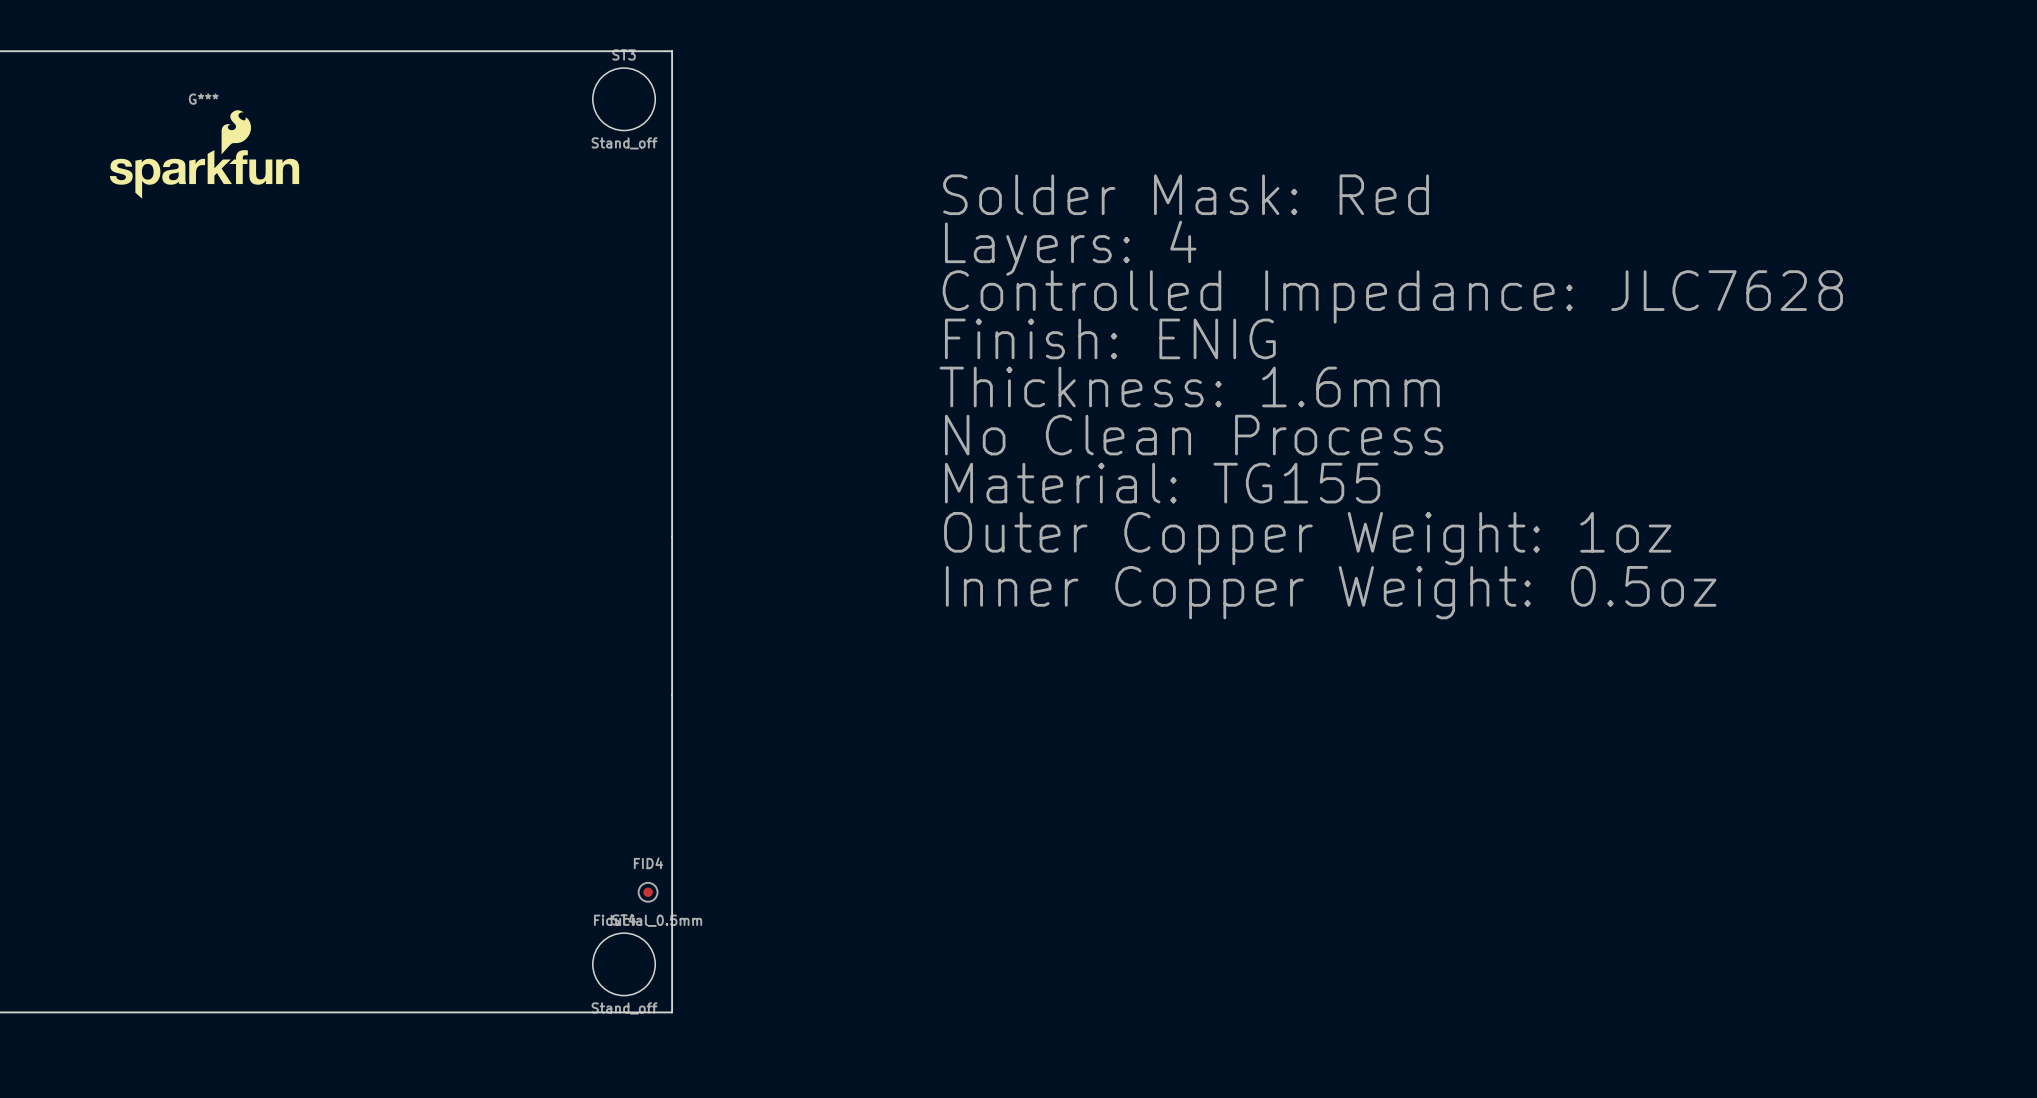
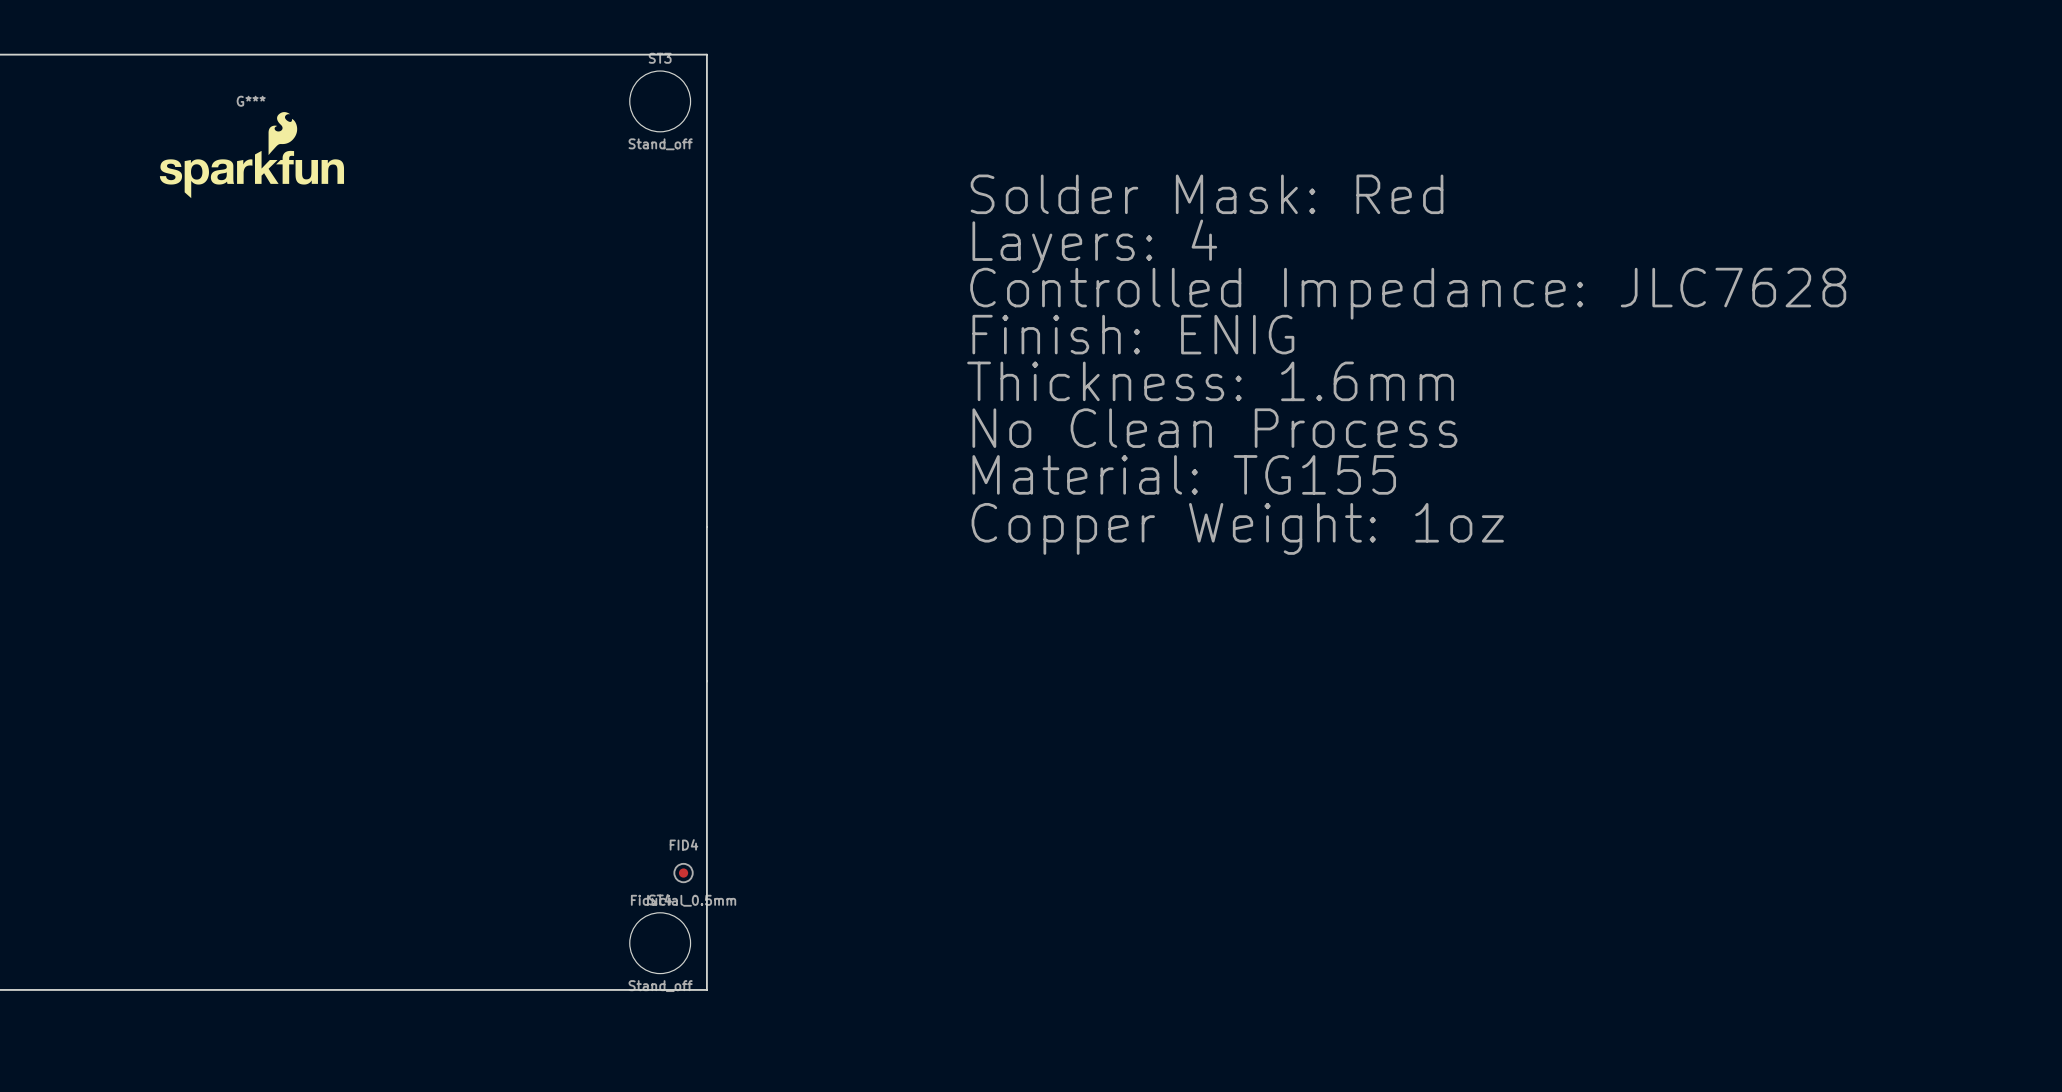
text: Outer Copper Weight: 1oz (1307, 538) -> Copper Weight: 1oz (1237, 528)
text: Inner Copper Weight: 0.5oz (1331, 592) -> none

